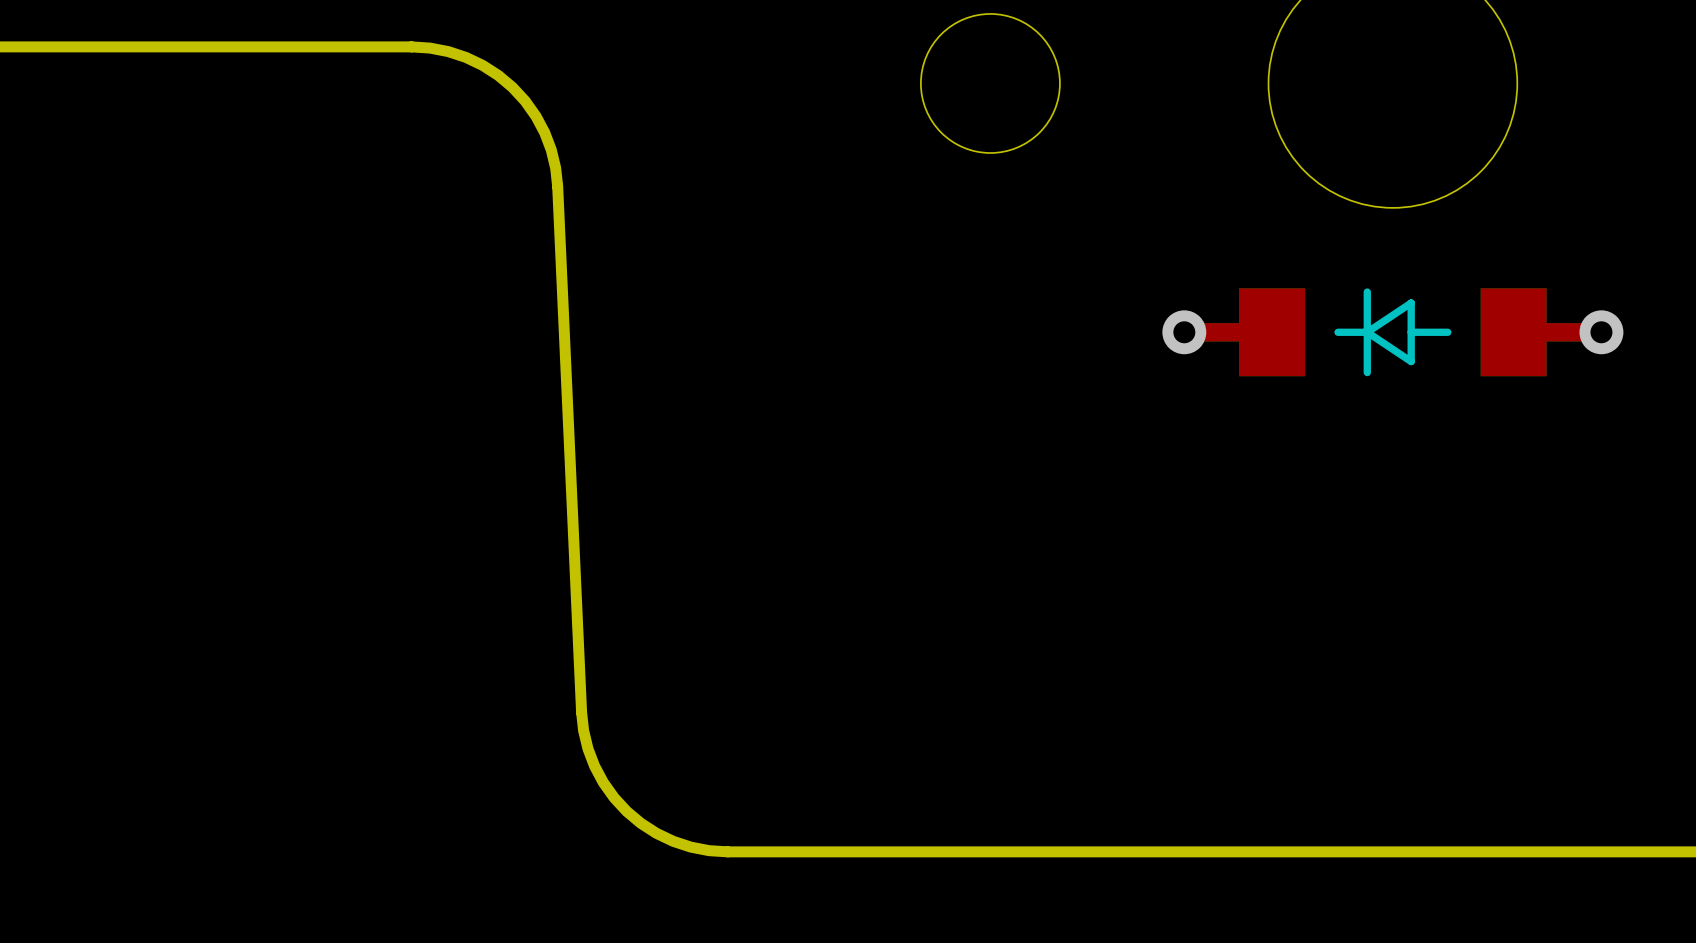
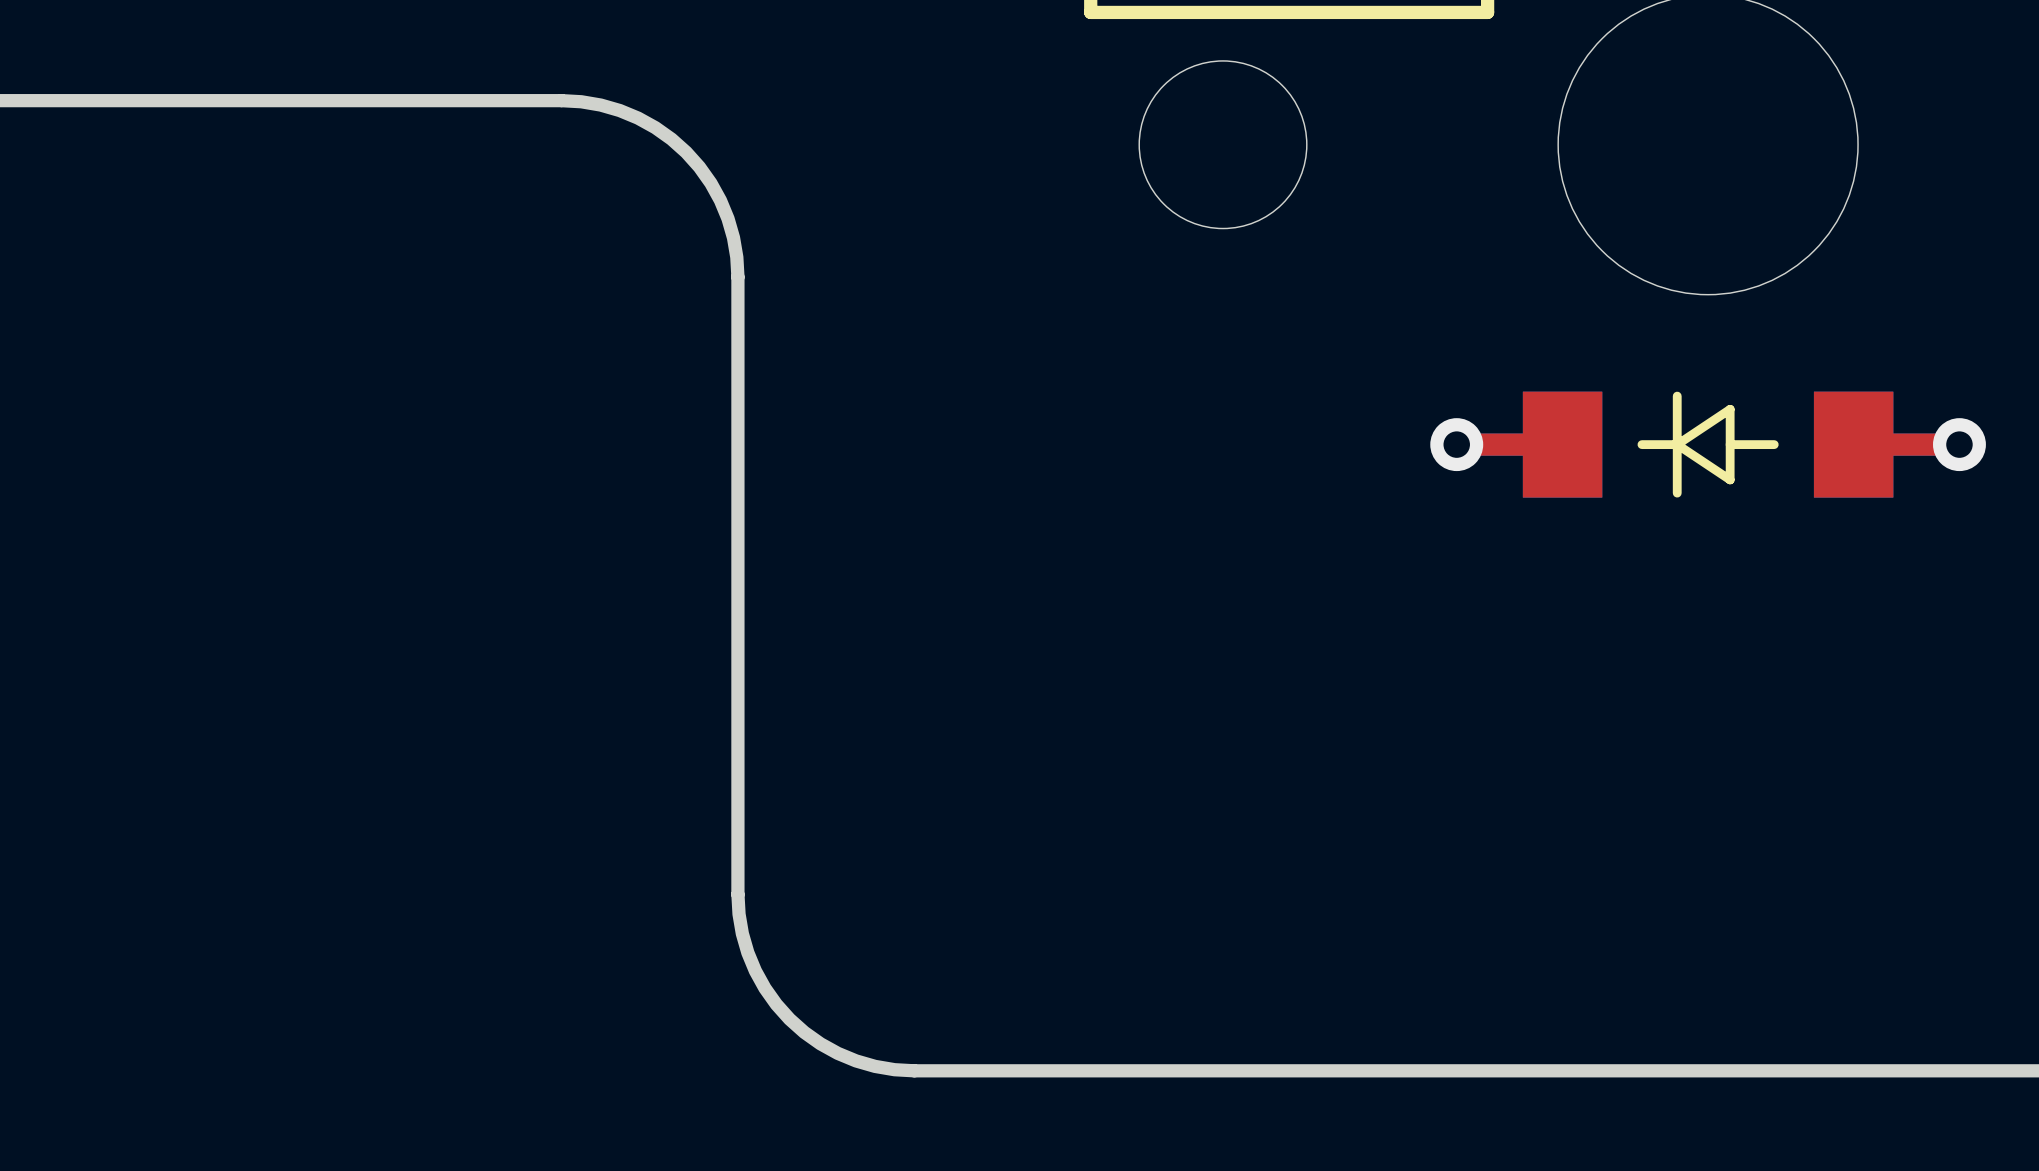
board edge: (411, 46) (448, 51) (465, 57) (498, 75) (512, 87) (535, 116) (551, 150) (557, 186) (581, 712) (583, 730) (594, 766) (614, 797) (626, 811) (656, 833) (690, 847) (709, 850) (734, 851) -> (525, 100) (581, 101) (600, 105) (619, 110) (655, 127) (686, 152) (699, 167) (720, 200) (728, 218) (736, 257) (737, 277) (737, 894) (742, 933) (755, 970) (764, 988) (789, 1019) (804, 1032) (820, 1043) (856, 1060) (875, 1066) (914, 1070)

